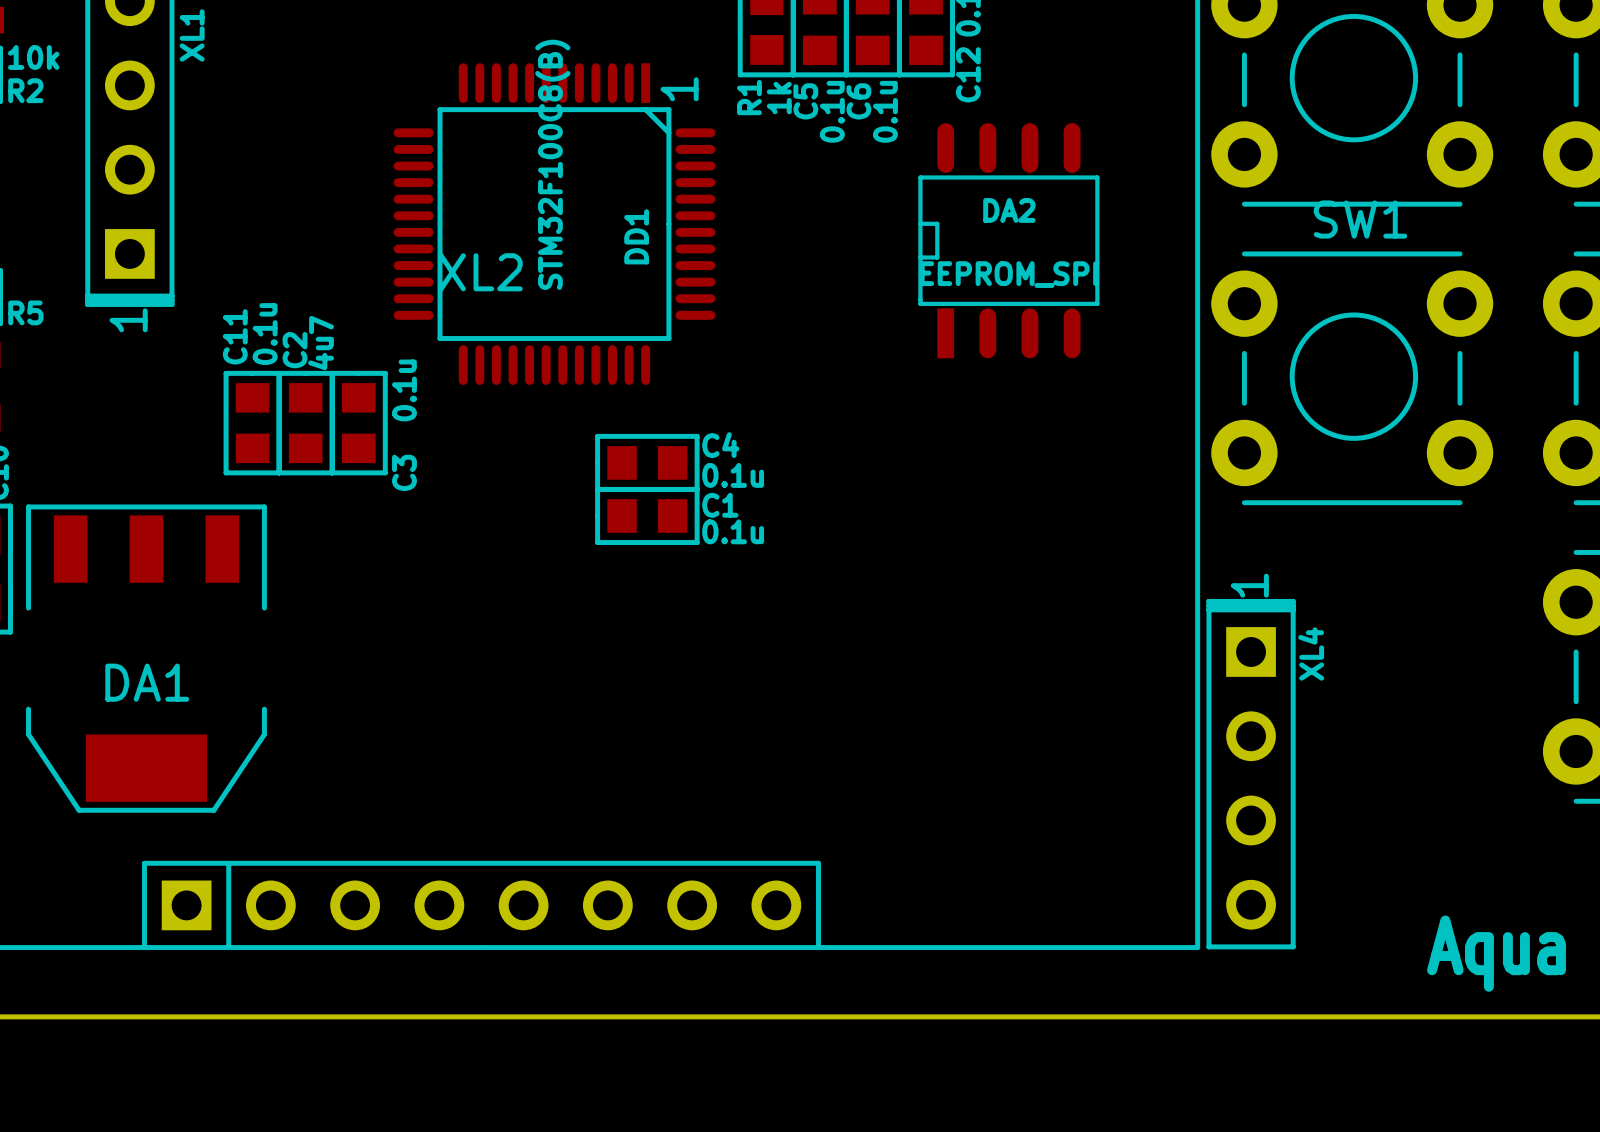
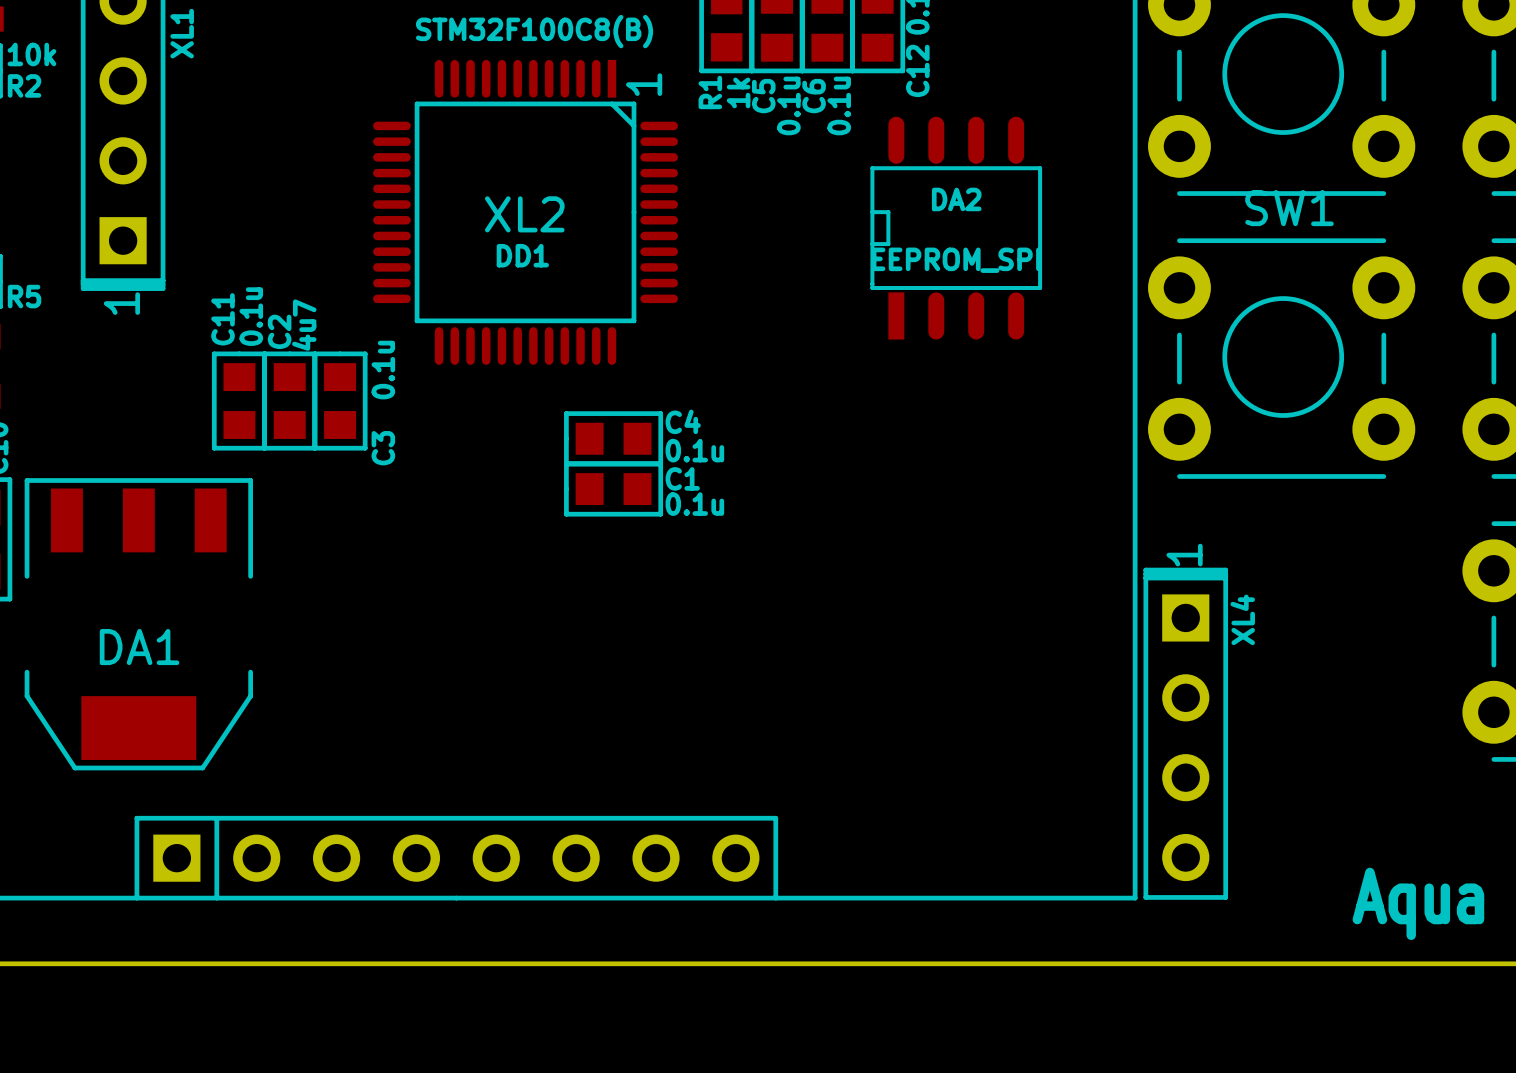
DD1 value rotation: 0° (552, 164) -> 90° clockwise (534, 31)
DD1 name rotation: 0° (636, 236) -> 90° clockwise (522, 255)
DD1 name position: DD1 (636, 236) -> DD1 (522, 255)
XL2 name position: XL2 (480, 272) -> XL2 (524, 214)

